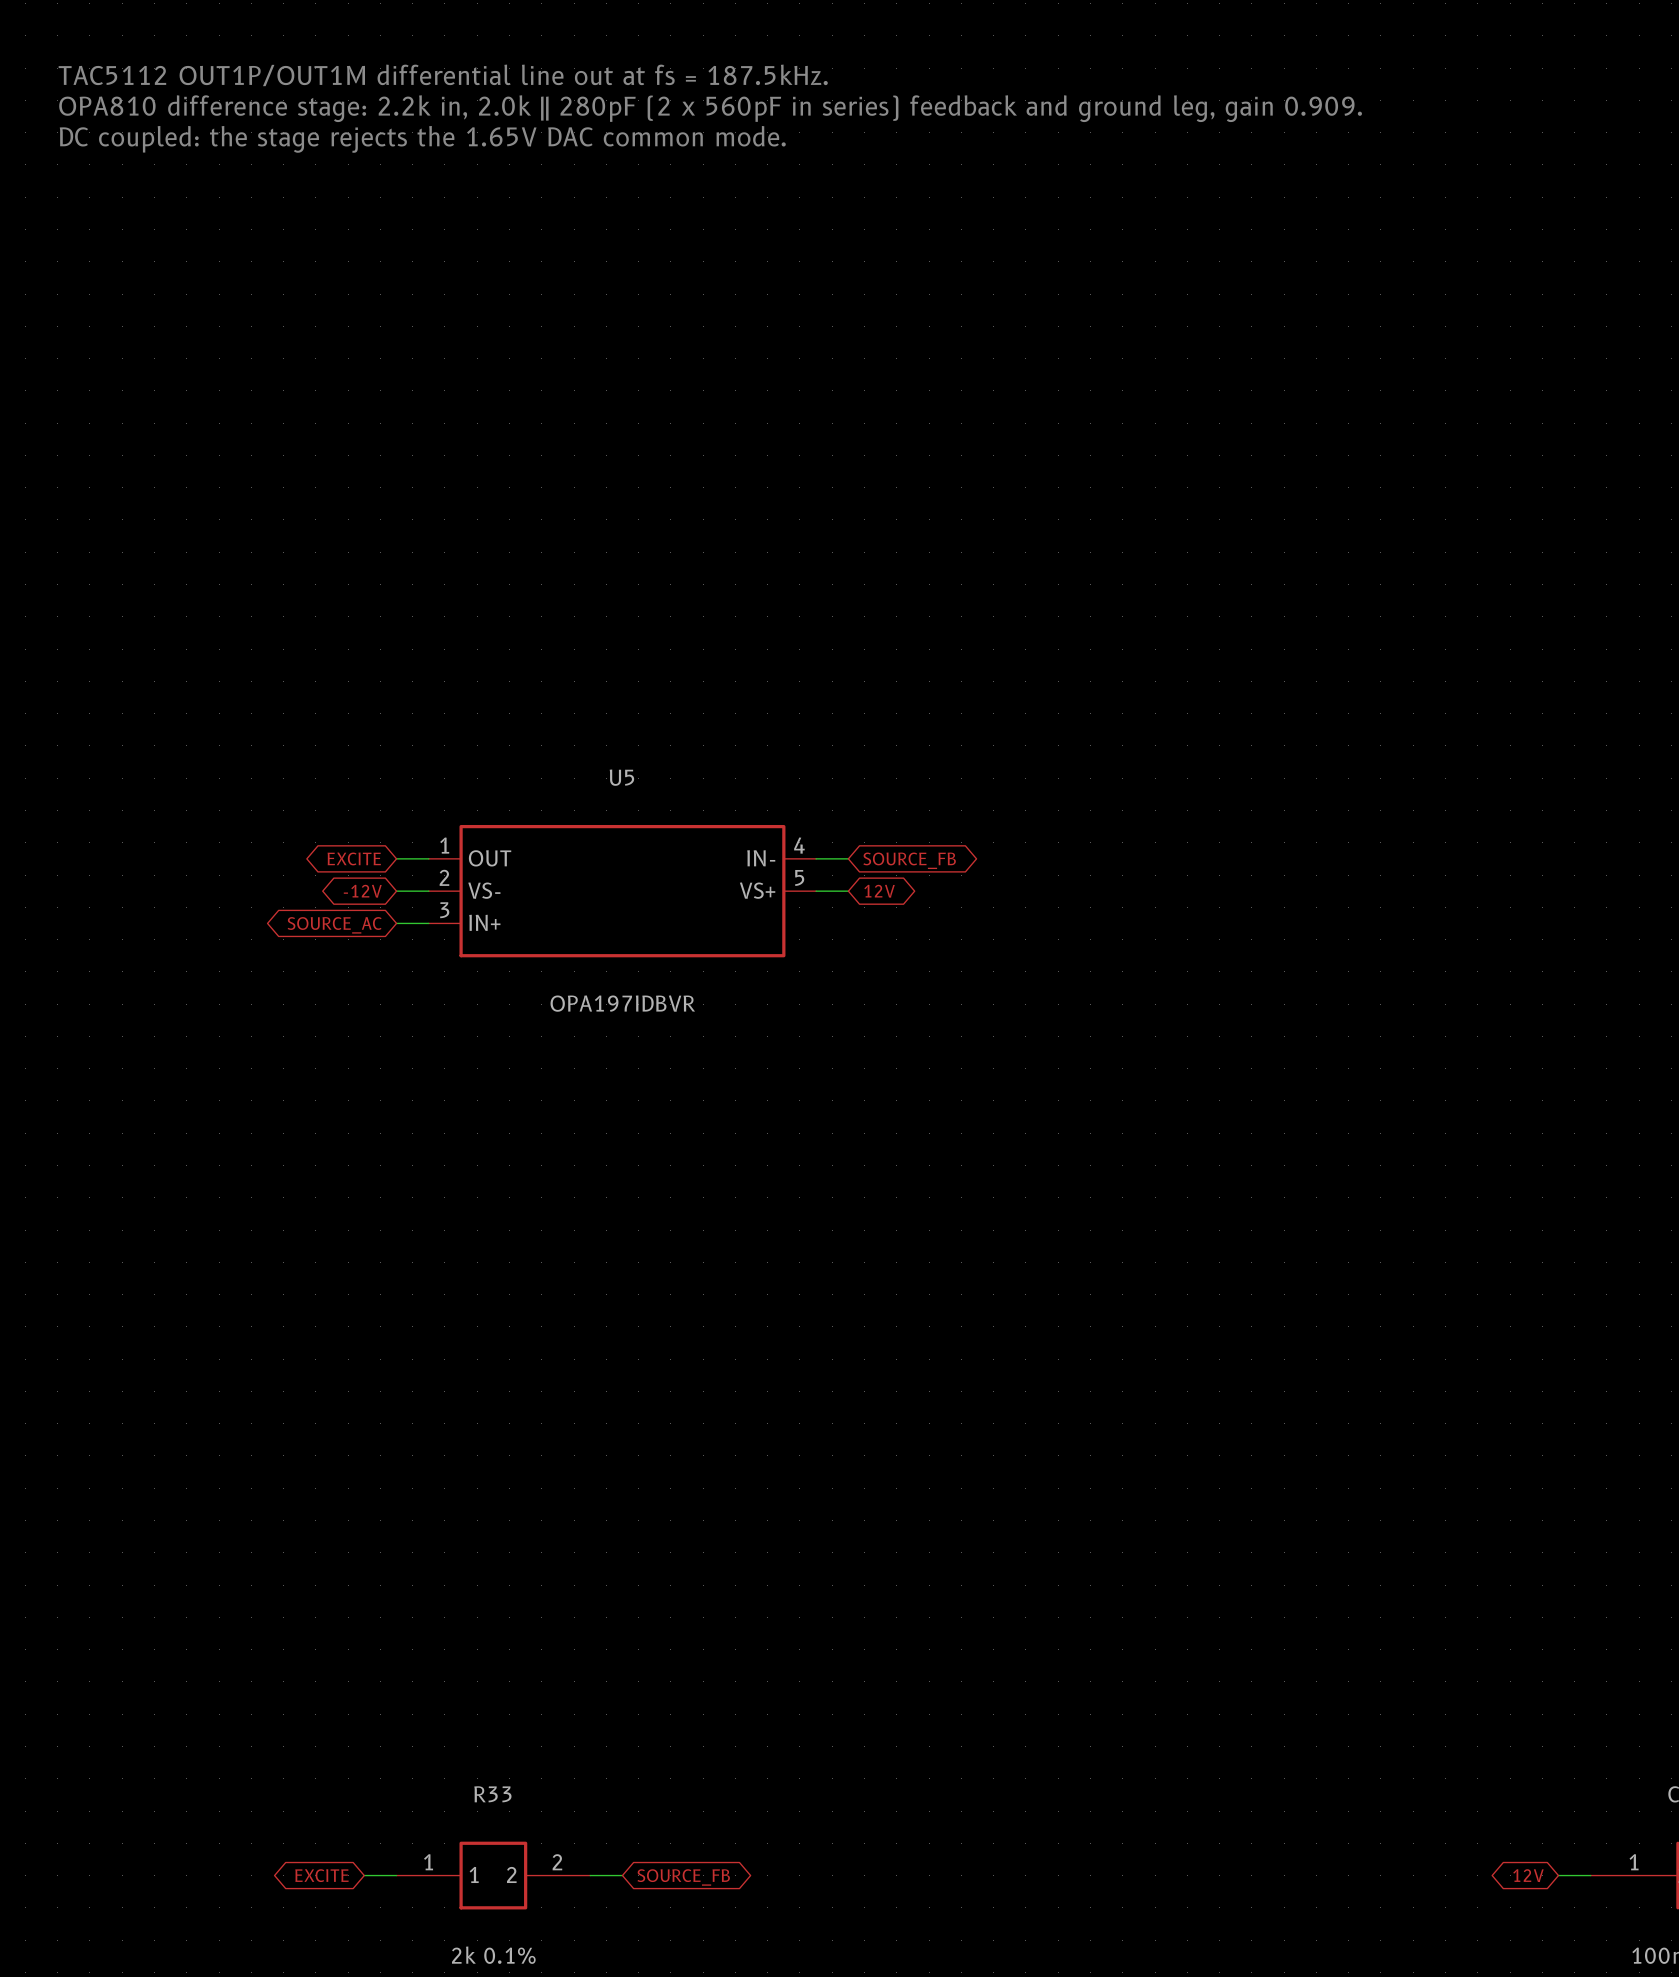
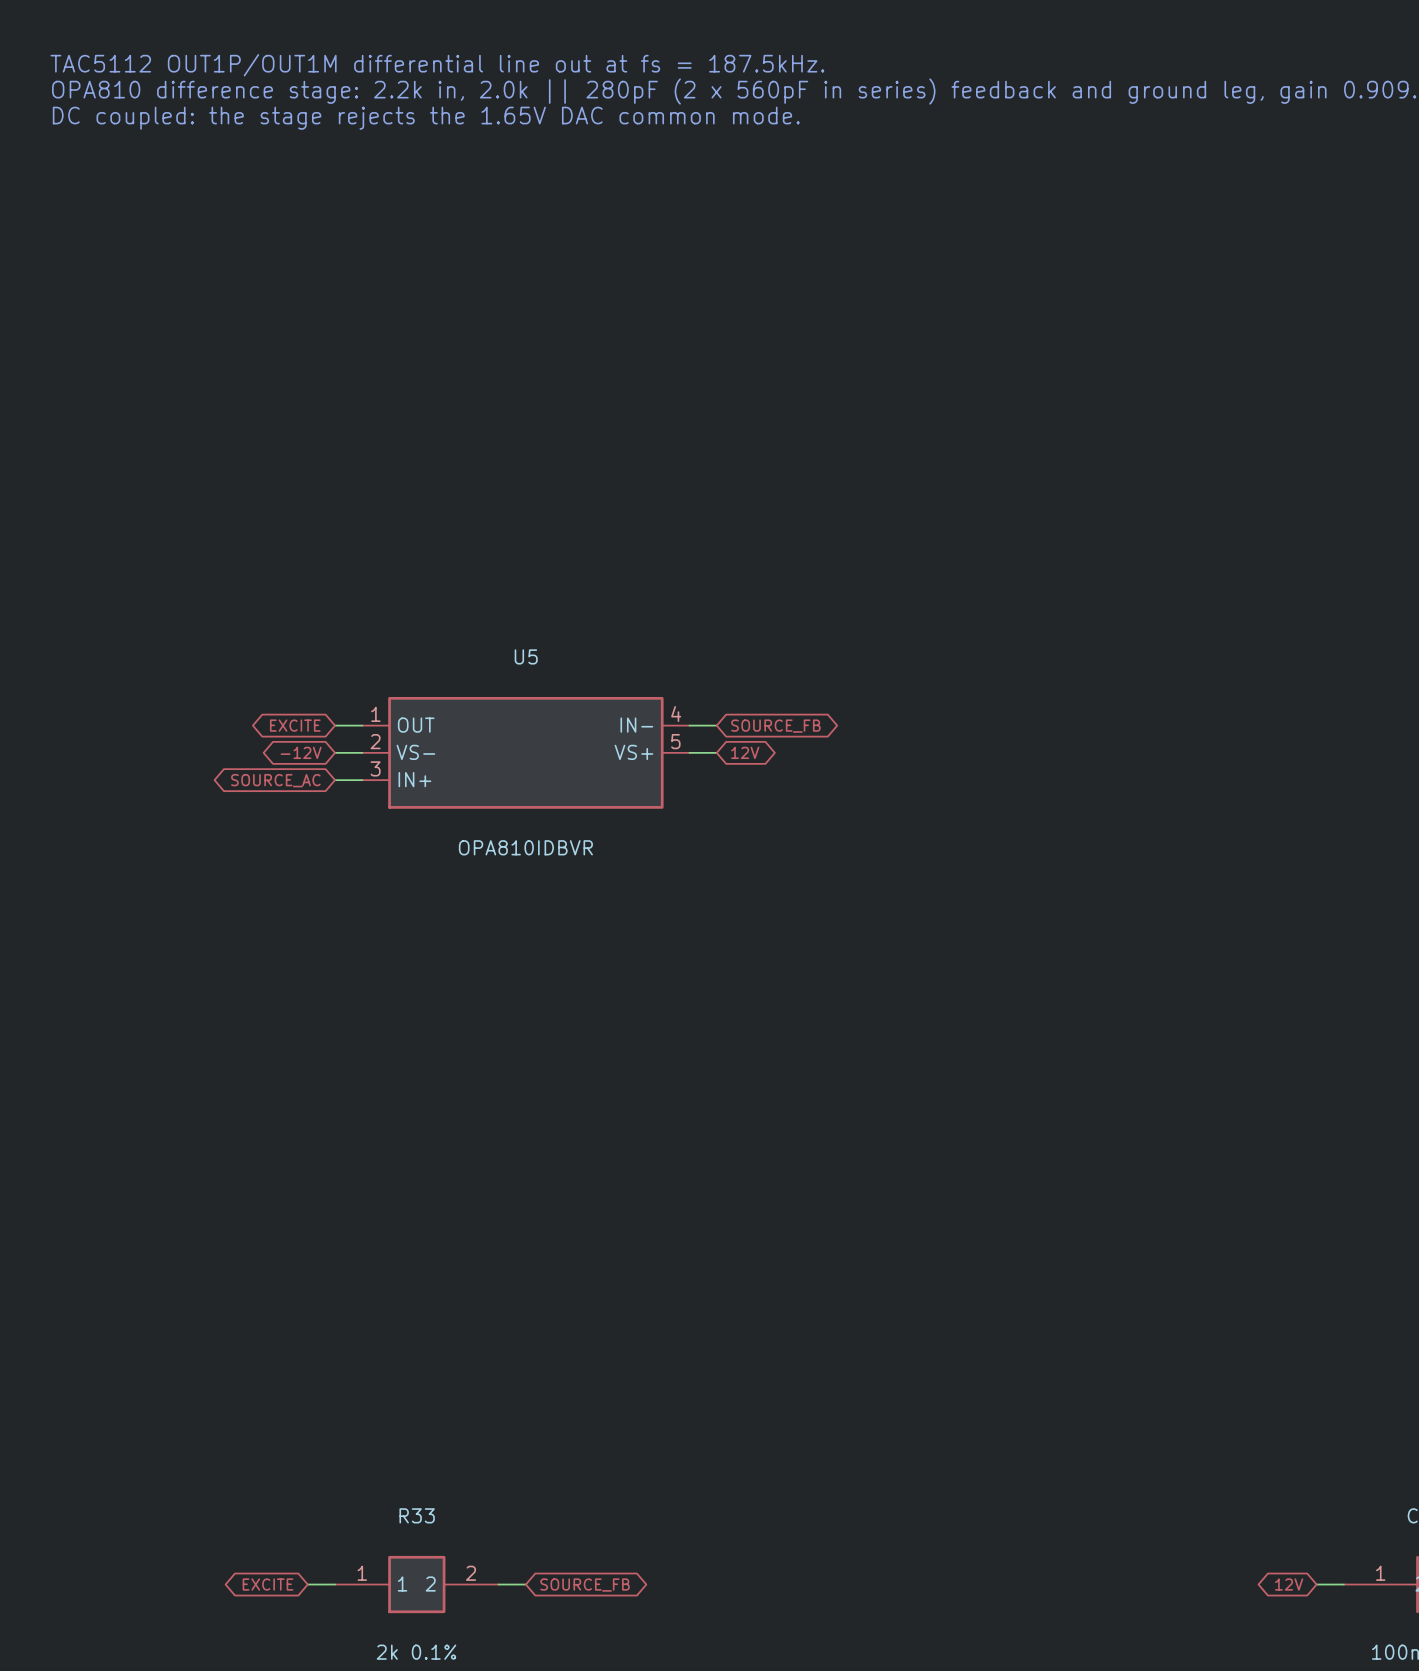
U5 value: OPA197IDBVR (622, 1003) -> OPA810IDBVR (525, 847)

